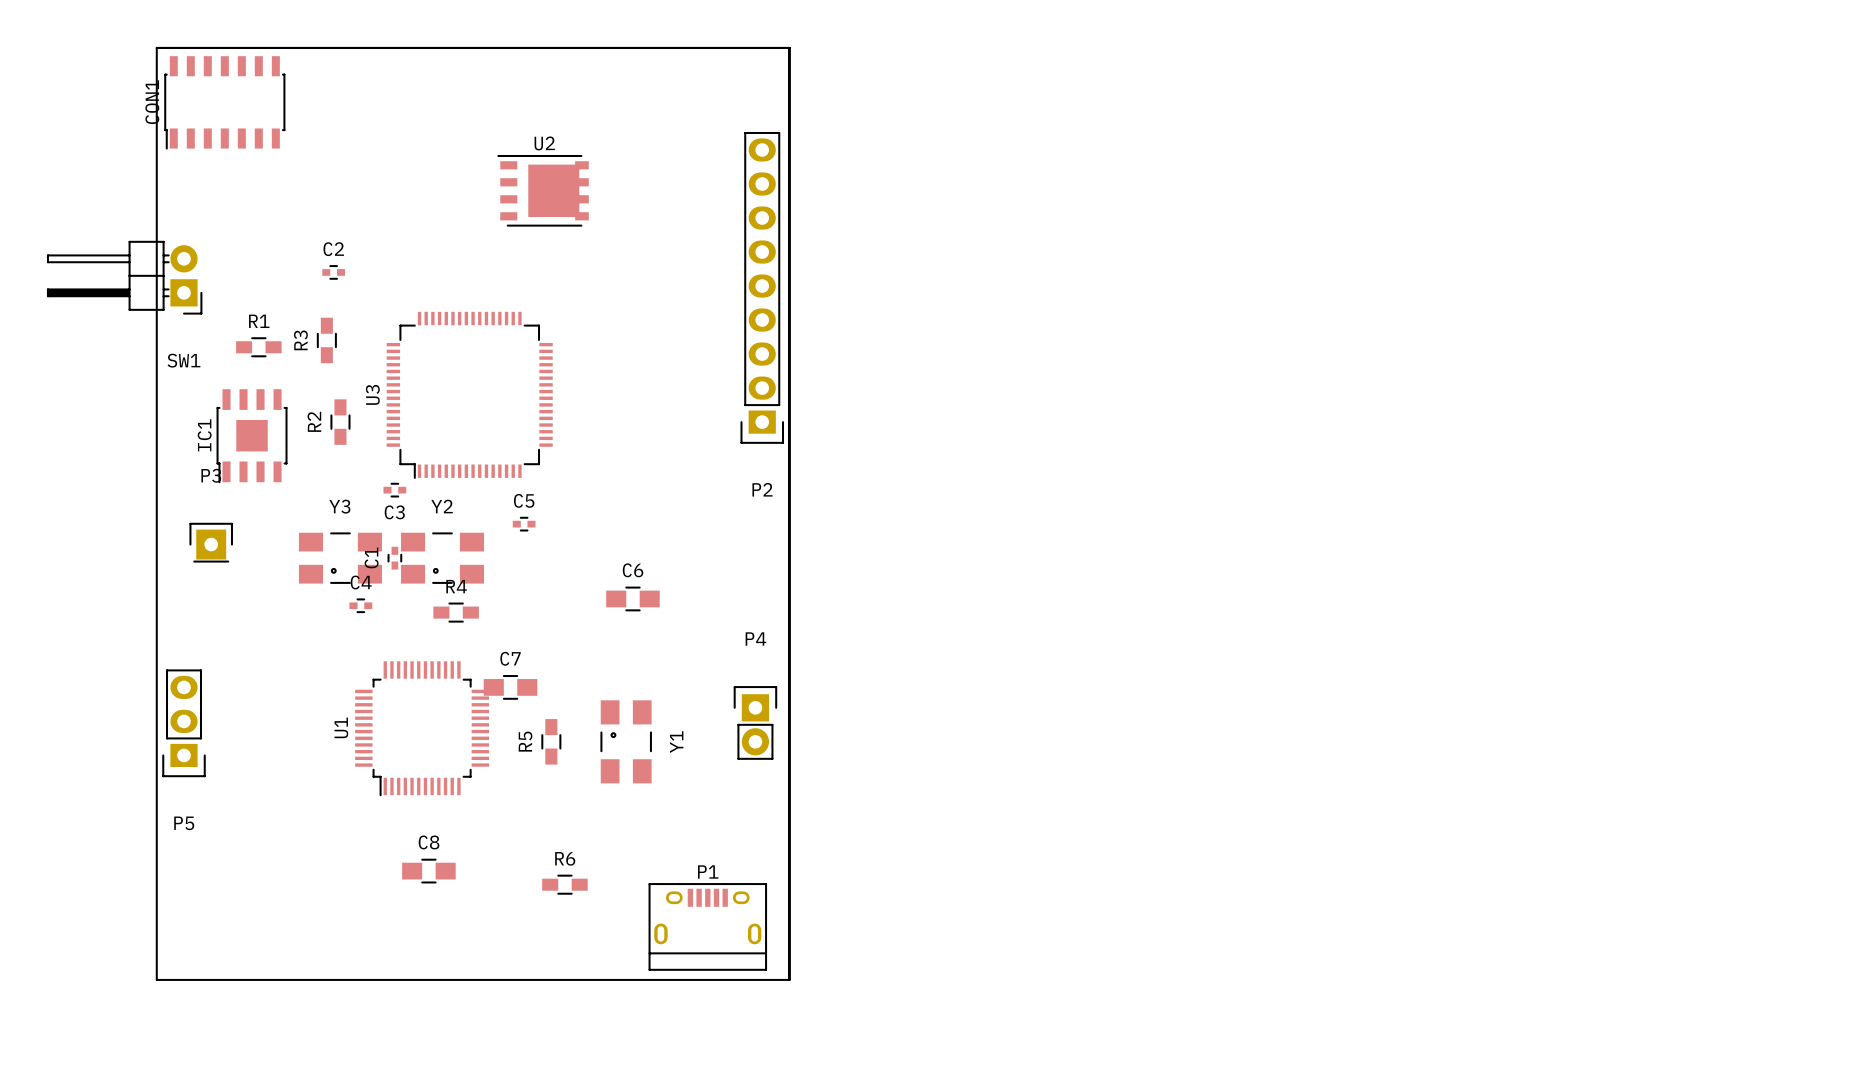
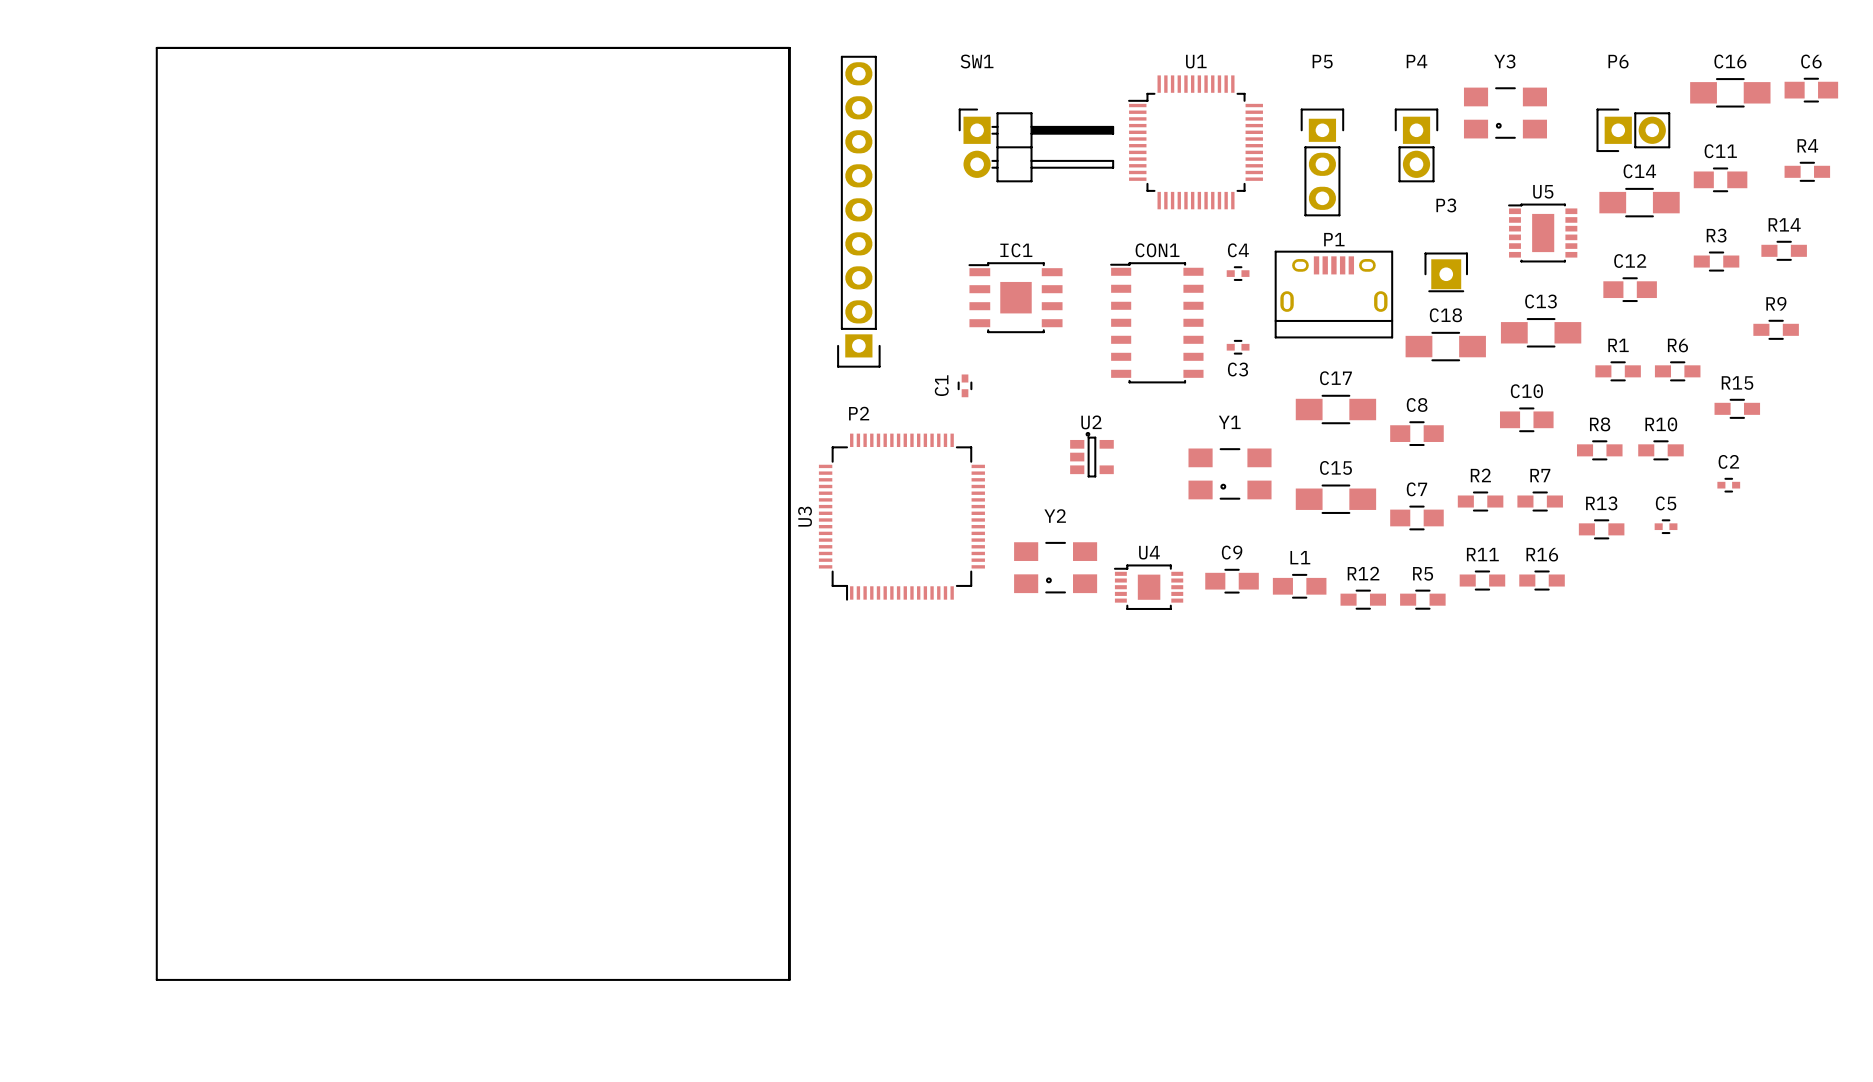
C16: none -> (1730, 92)
CON1 rotation: 0° (224, 102) -> 90° clockwise (1156, 322)
CON1 position: (224, 102) -> (1156, 322)
P6: none -> (1633, 130)
U2 footprint: [497, 154, 589, 227] -> [1070, 431, 1114, 478]
C11: none -> (1720, 179)
C14: none -> (1639, 202)
U5: none -> (1542, 233)
R14: none -> (1784, 250)
C2 position: (333, 272) -> (1728, 485)
SW1 rotation: 0° (124, 277) -> 180° (1036, 145)
SW1 position: (124, 277) -> (1036, 145)
P2 position: (762, 287) -> (858, 211)
C12: none -> (1630, 289)
R9: none -> (1776, 329)
C13: none -> (1541, 332)
R3 rotation: 0° (326, 340) -> 90° clockwise (1716, 261)
R3 position: (326, 340) -> (1716, 261)
C18: none -> (1445, 346)
R1 position: (258, 347) -> (1618, 371)
U3 position: (469, 395) -> (901, 517)
R15: none -> (1737, 408)
C17: none -> (1335, 409)
C10: none -> (1526, 419)
R2 rotation: 0° (340, 422) -> 90° clockwise (1480, 501)
R2 position: (340, 422) -> (1480, 501)
IC1 rotation: 0° (252, 436) -> 90° clockwise (1015, 297)
IC1 position: (252, 436) -> (1015, 297)
R8: none -> (1599, 450)
R10: none -> (1660, 450)
C3 position: (394, 490) -> (1238, 347)
C15: none -> (1335, 499)
R7: none -> (1540, 501)
C5 position: (524, 524) -> (1666, 526)
R13: none -> (1601, 529)
P3 position: (211, 542) -> (1446, 272)
Y3 position: (340, 558) -> (1505, 113)
C1 position: (394, 558) -> (965, 385)
Y2 position: (442, 558) -> (1055, 567)
R11: none -> (1482, 580)
R16: none -> (1542, 580)
C9: none -> (1232, 581)
L1: none -> (1299, 586)
U4: none -> (1148, 587)
C6 position: (632, 598) -> (1811, 90)
R12: none -> (1363, 599)
C4 position: (360, 605) -> (1238, 273)
R4 position: (456, 612) -> (1807, 171)
C7 position: (510, 687) -> (1416, 517)
P4 position: (755, 722) -> (1416, 145)
P5 rotation: 0° (184, 723) -> 180° (1322, 162)
P5 position: (184, 723) -> (1322, 162)
U1 rotation: 0° (422, 728) -> 90° clockwise (1195, 142)
U1 position: (422, 728) -> (1195, 142)
R5 rotation: 0° (551, 741) -> 90° clockwise (1422, 599)
R5 position: (551, 741) -> (1422, 599)
Y1 rotation: 0° (626, 741) -> 90° counterclockwise (1230, 473)
Y1 position: (626, 741) -> (1230, 473)
C8 position: (428, 871) -> (1416, 433)
R6 position: (564, 884) -> (1677, 371)
P1 position: (707, 926) -> (1333, 294)

